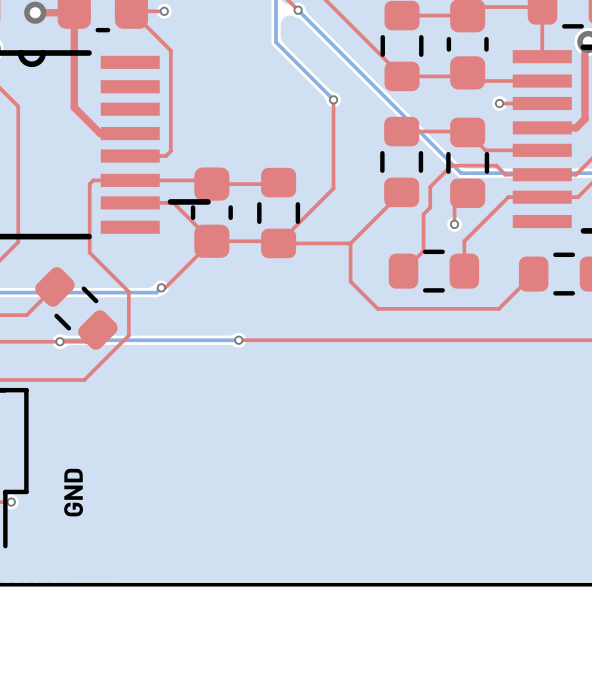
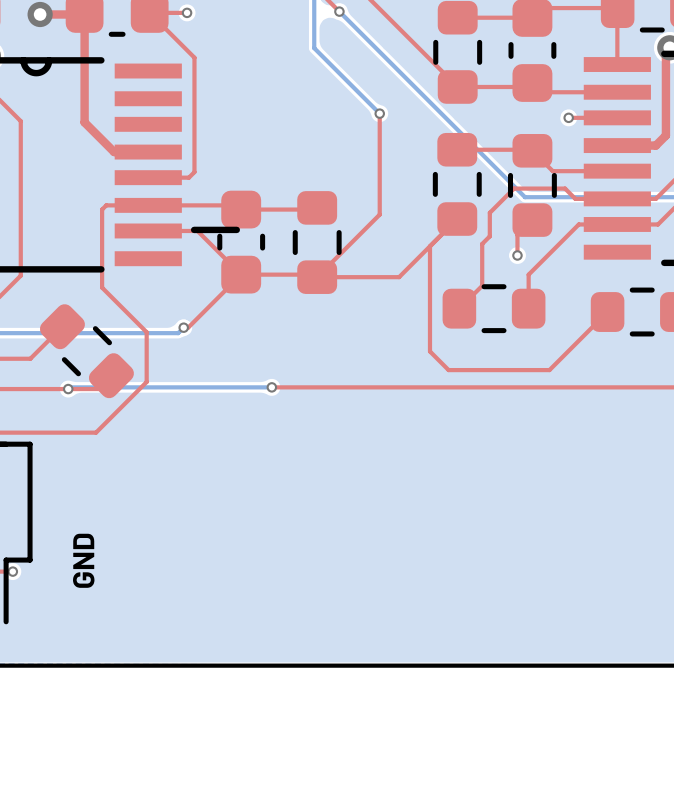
top track: (350, 243) (350, 281) (377, 308) (498, 308) -> (429, 246) (429, 351) (448, 370) (549, 370) (567, 351)

